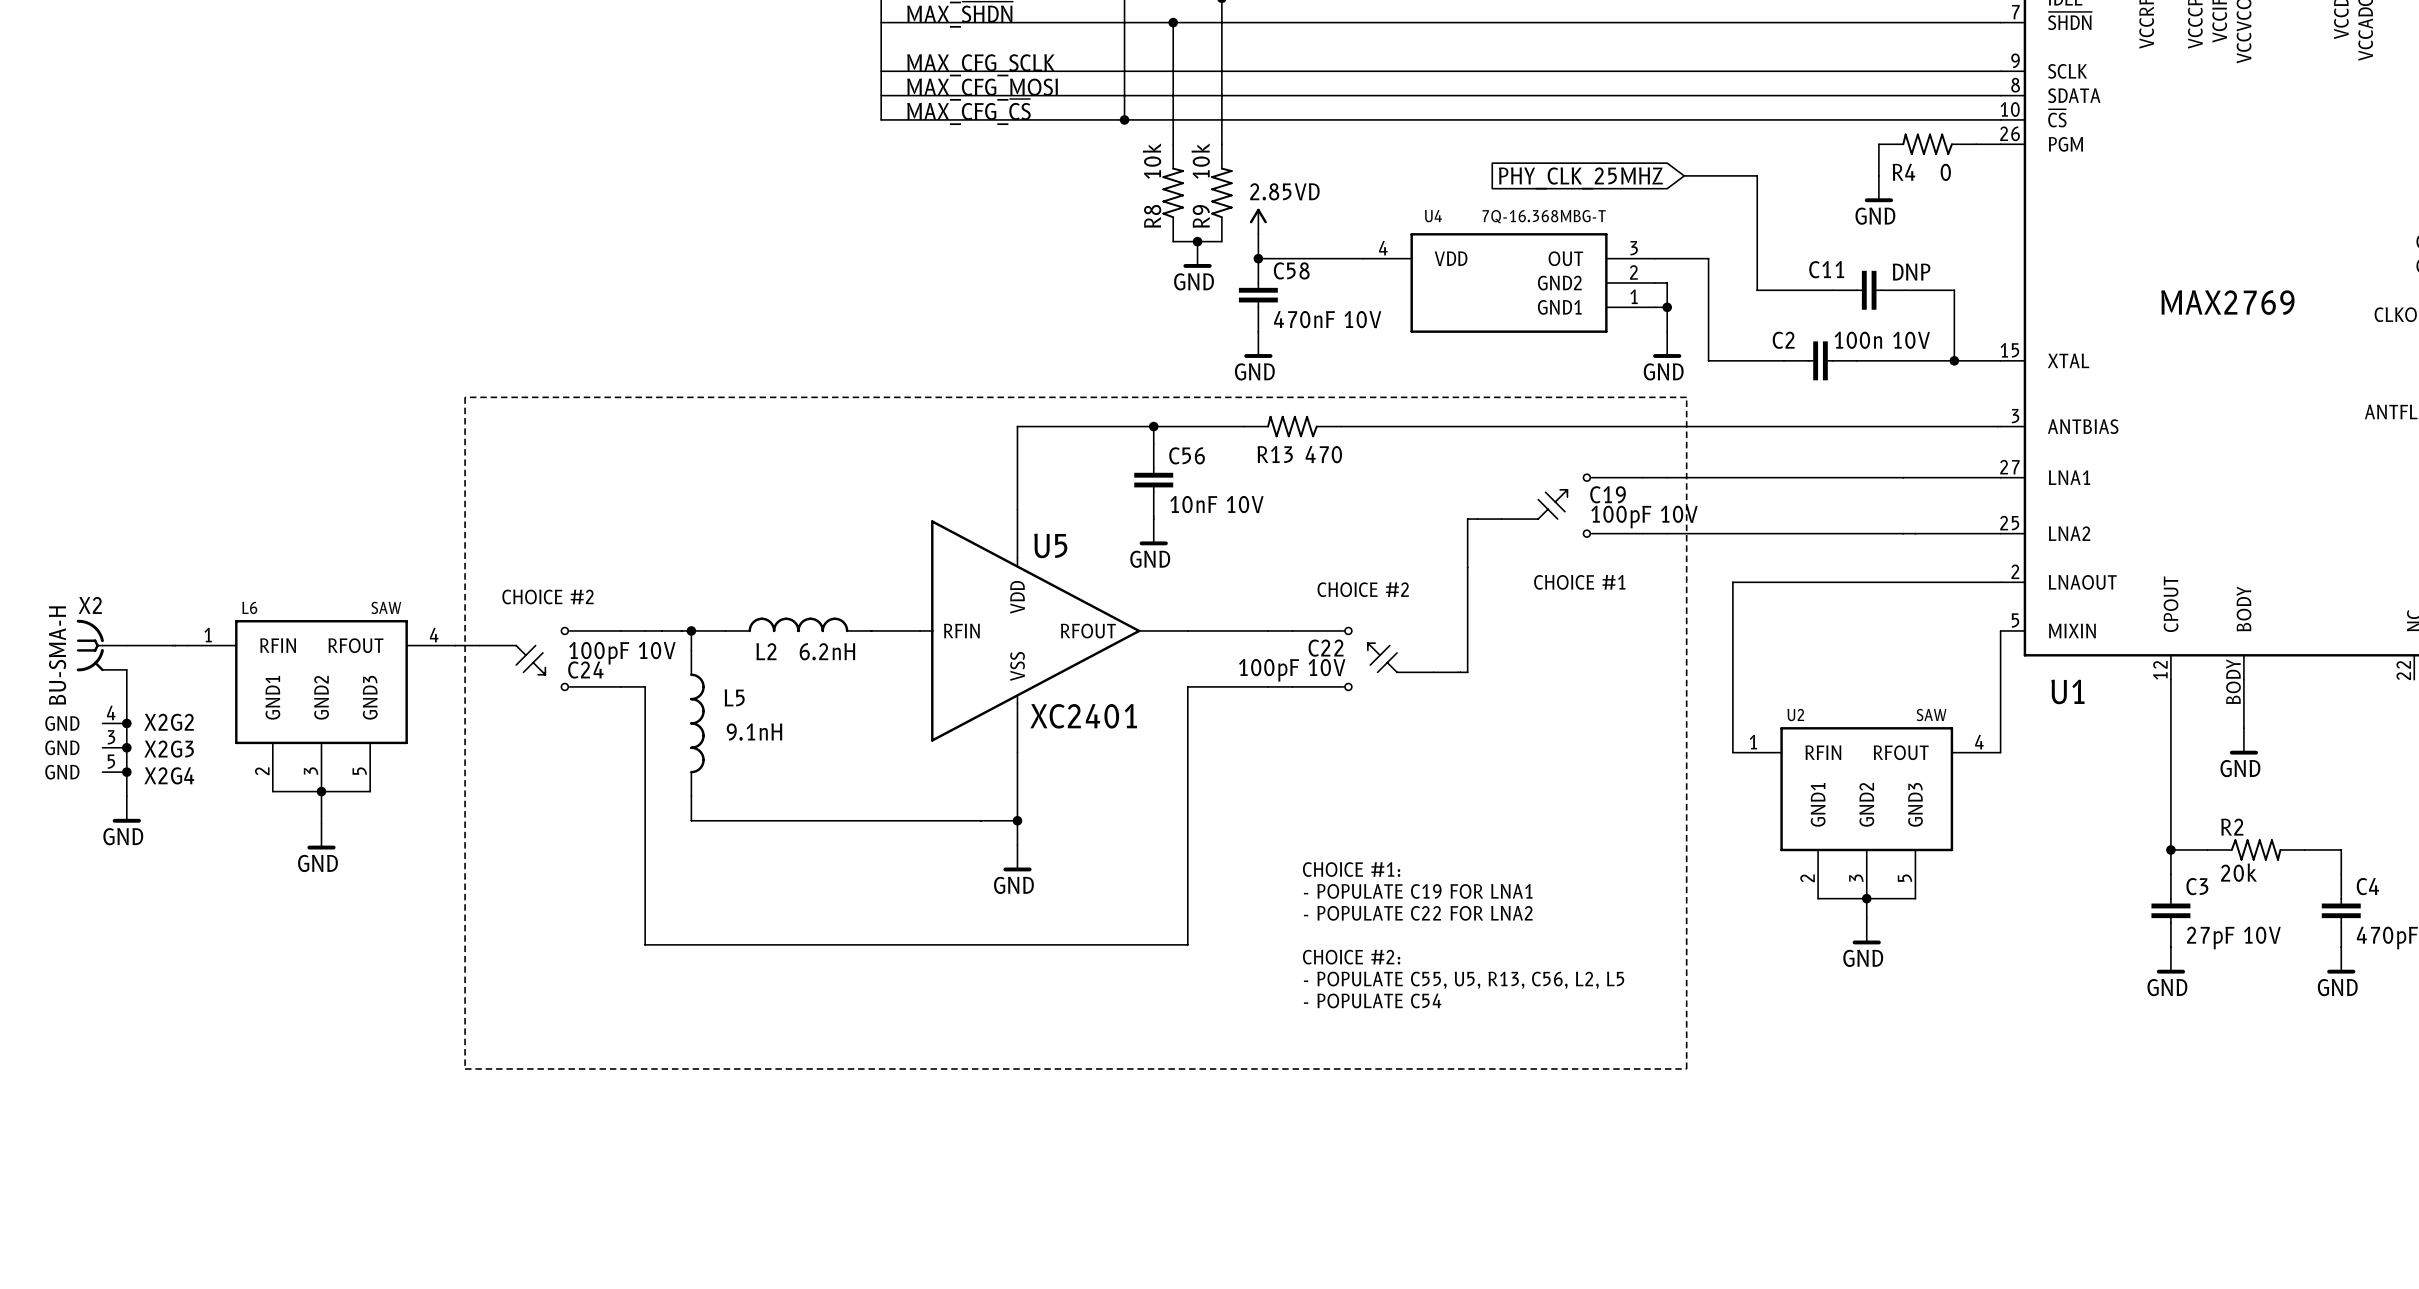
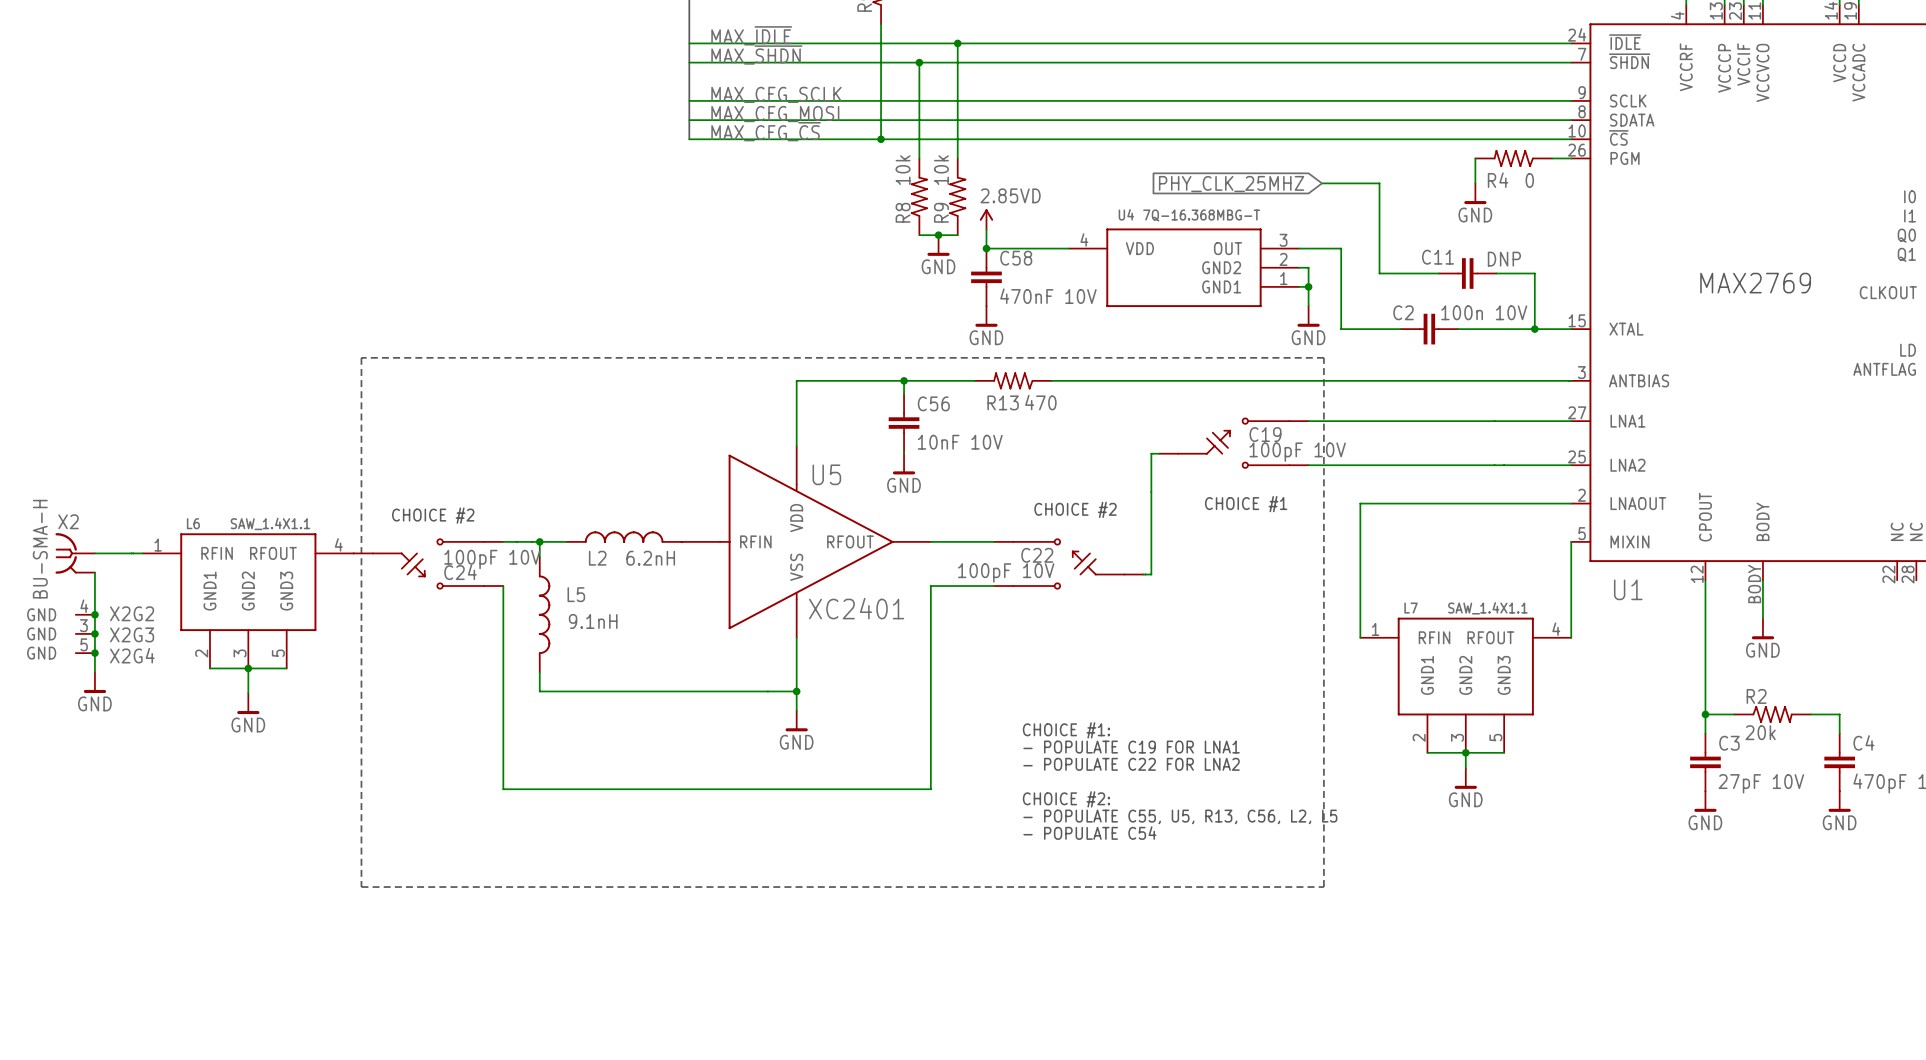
L6 value: SAW (386, 607) -> SAW_1.4X1.1 (270, 523)
U2 name: U2 (1795, 714) -> L7 (1411, 608)
U2 value: SAW (1931, 714) -> SAW_1.4X1.1 (1487, 608)

